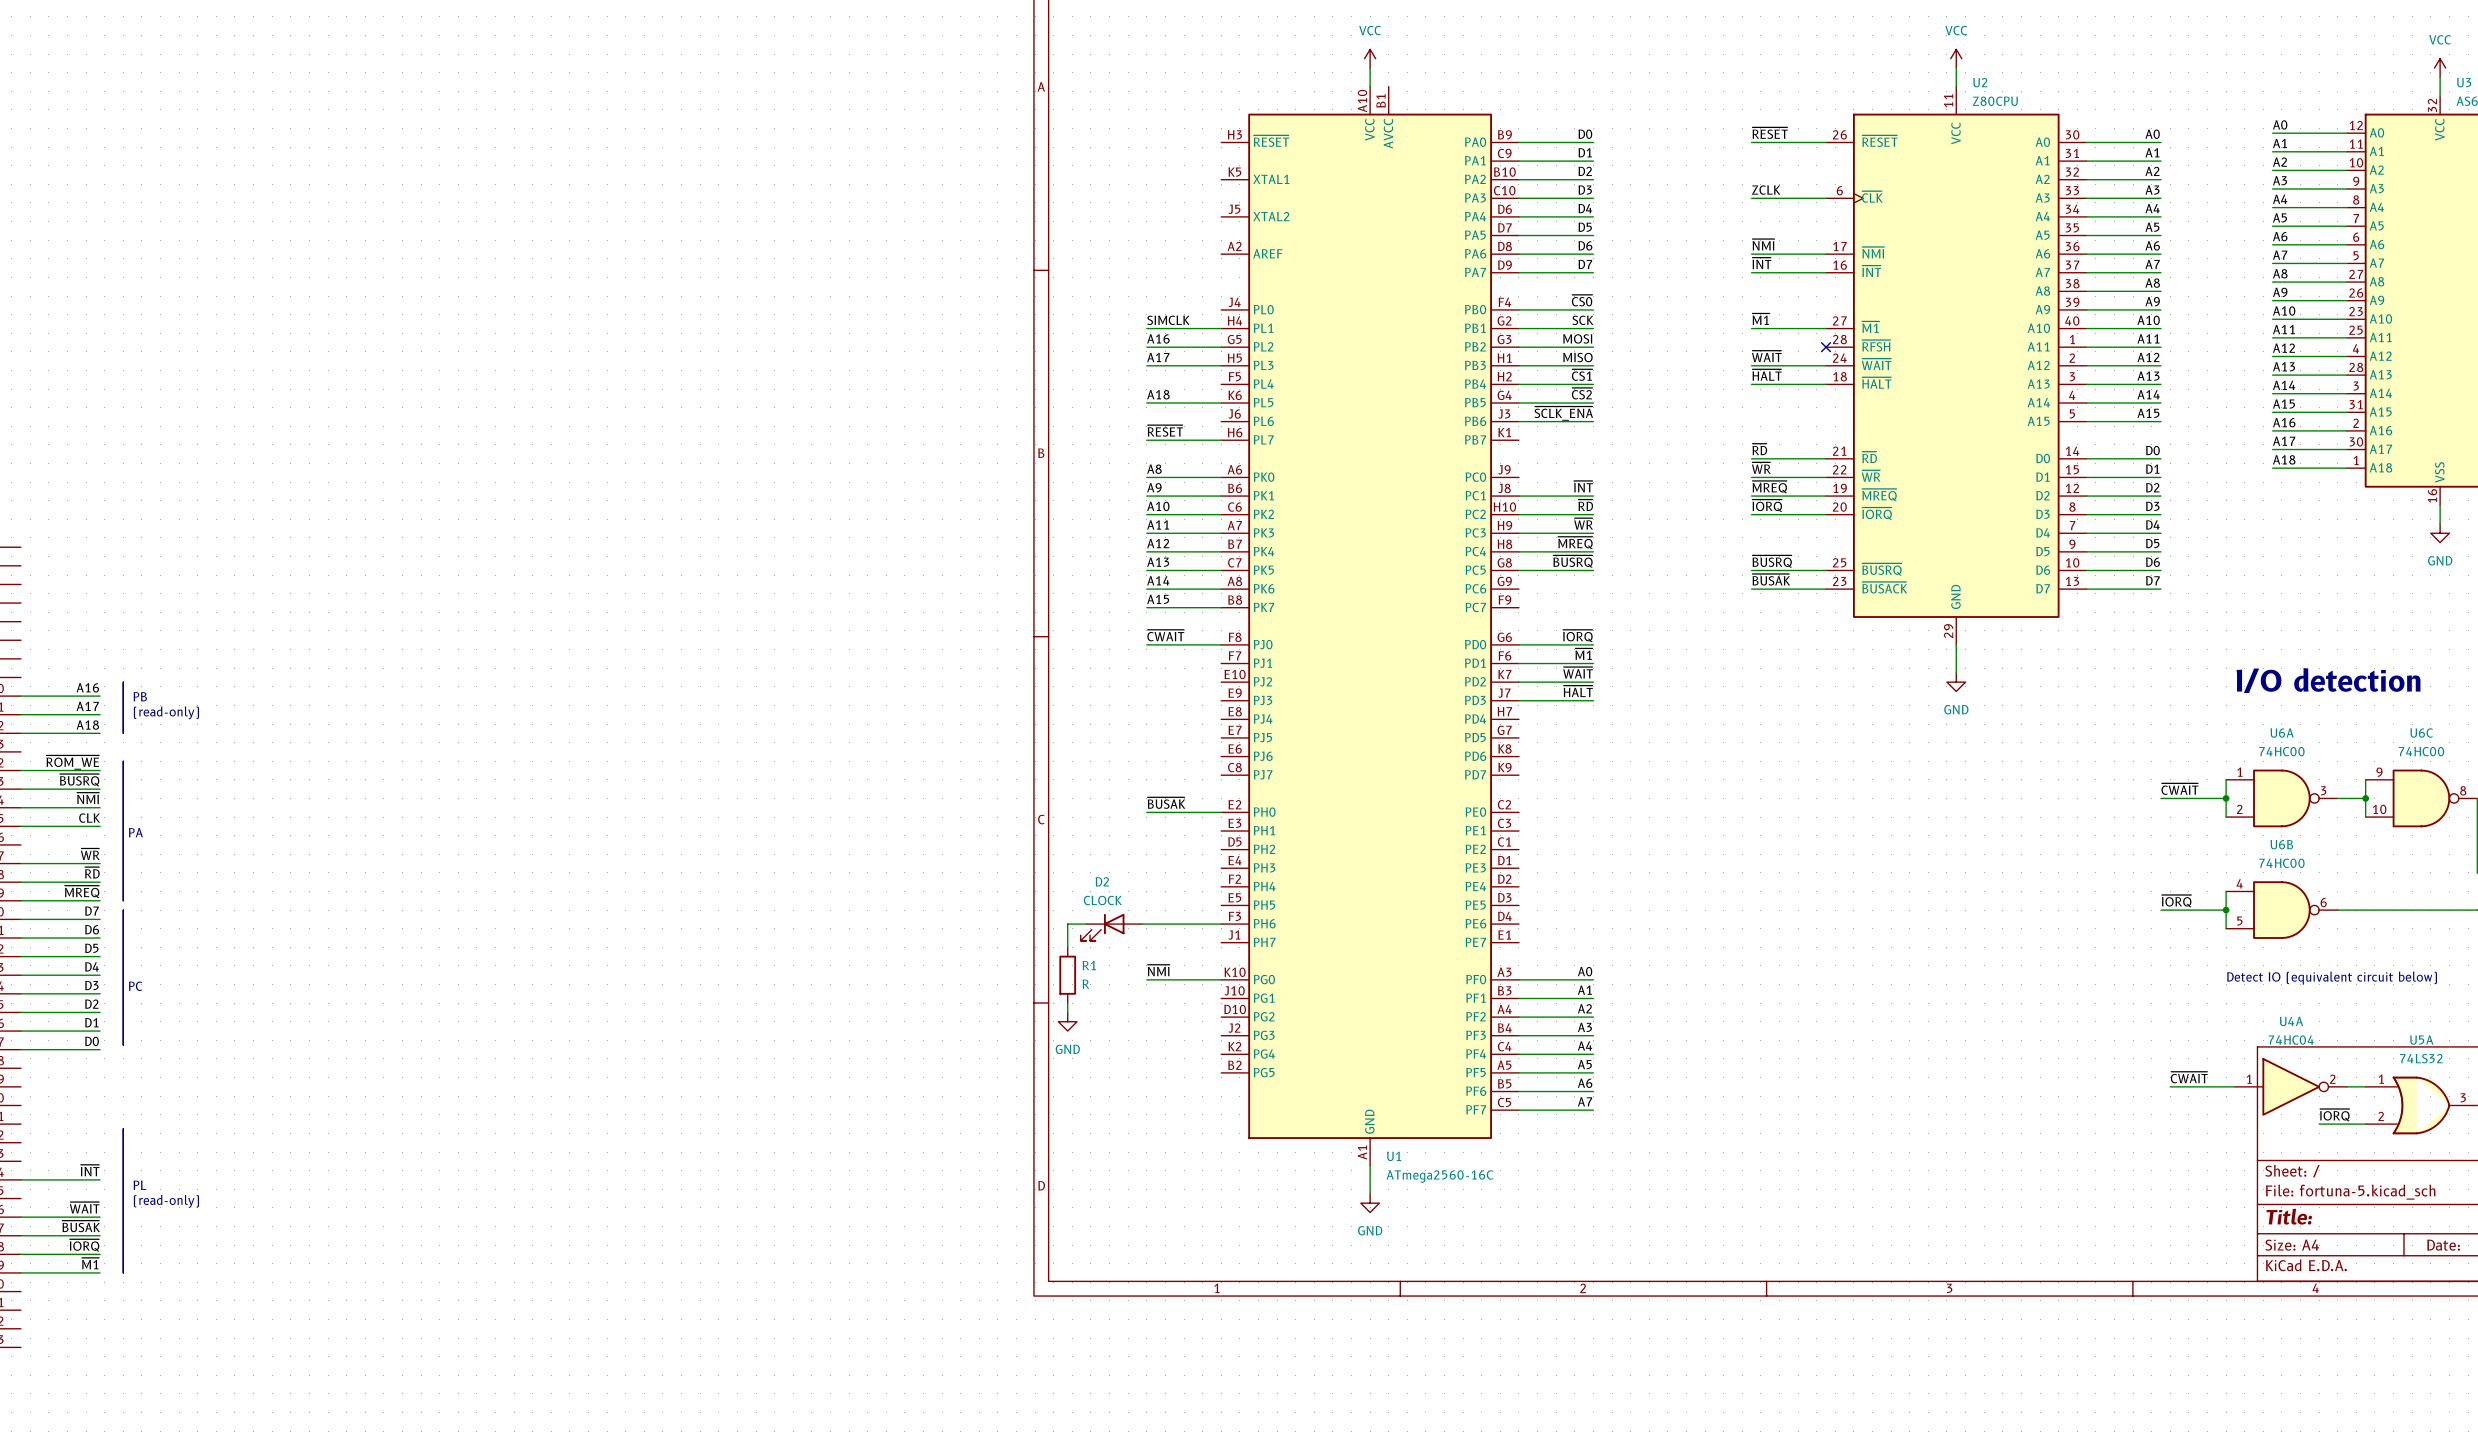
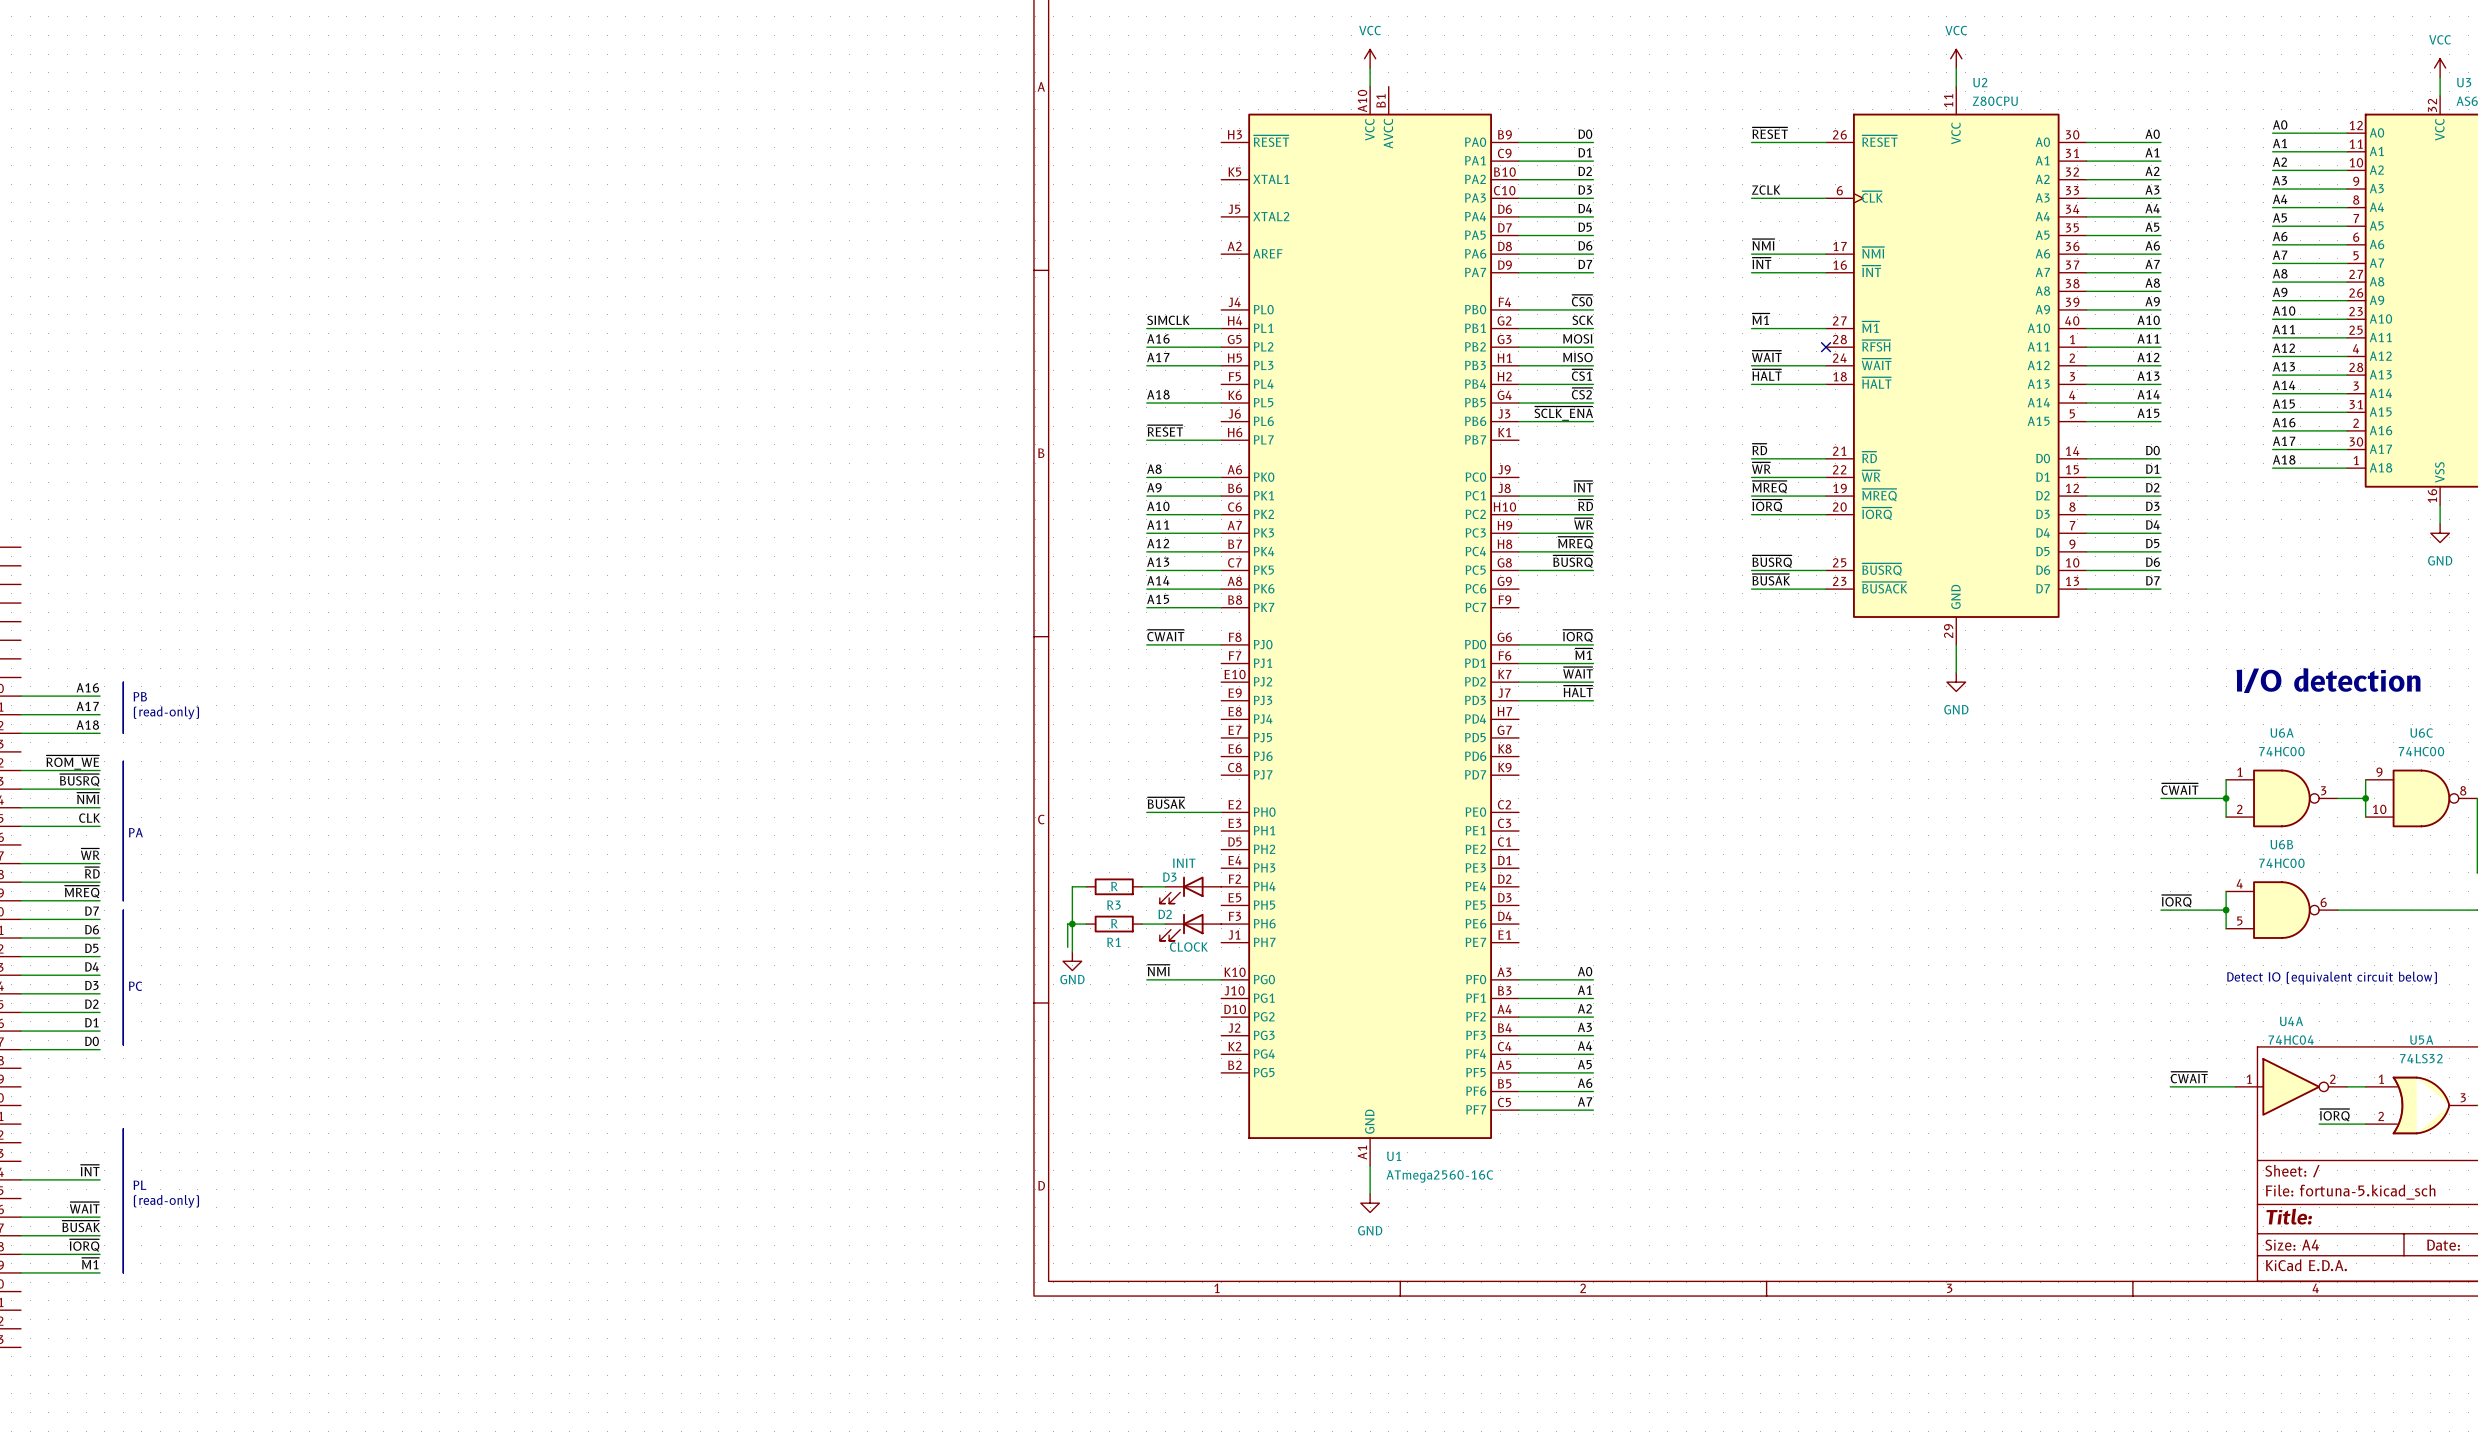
D2 name position: D2 (1102, 881) -> D2 (1165, 914)
wire: none -> (1086, 886) (1072, 886) (1072, 951)
R3: none -> R (1114, 886)
wire: none -> (1142, 886) (1165, 886)
D3: none -> INIT (1190, 890)
D2 value position: CLOCK (1102, 900) -> CLOCK (1188, 947)
junction: none -> (1072, 924)
D2 position: (1111, 927) -> (1190, 927)
R1 rotation: 0° (1067, 975) -> 90° clockwise (1114, 924)
R1 position: (1067, 975) -> (1114, 924)
R1 value position: R (1085, 984) -> R (1114, 923)
wire: (1067, 1003) (1067, 1012) -> none
power symbol position: GND (1067, 1021) -> GND (1072, 961)
power symbol text position: GND (1067, 1049) -> GND (1072, 979)

